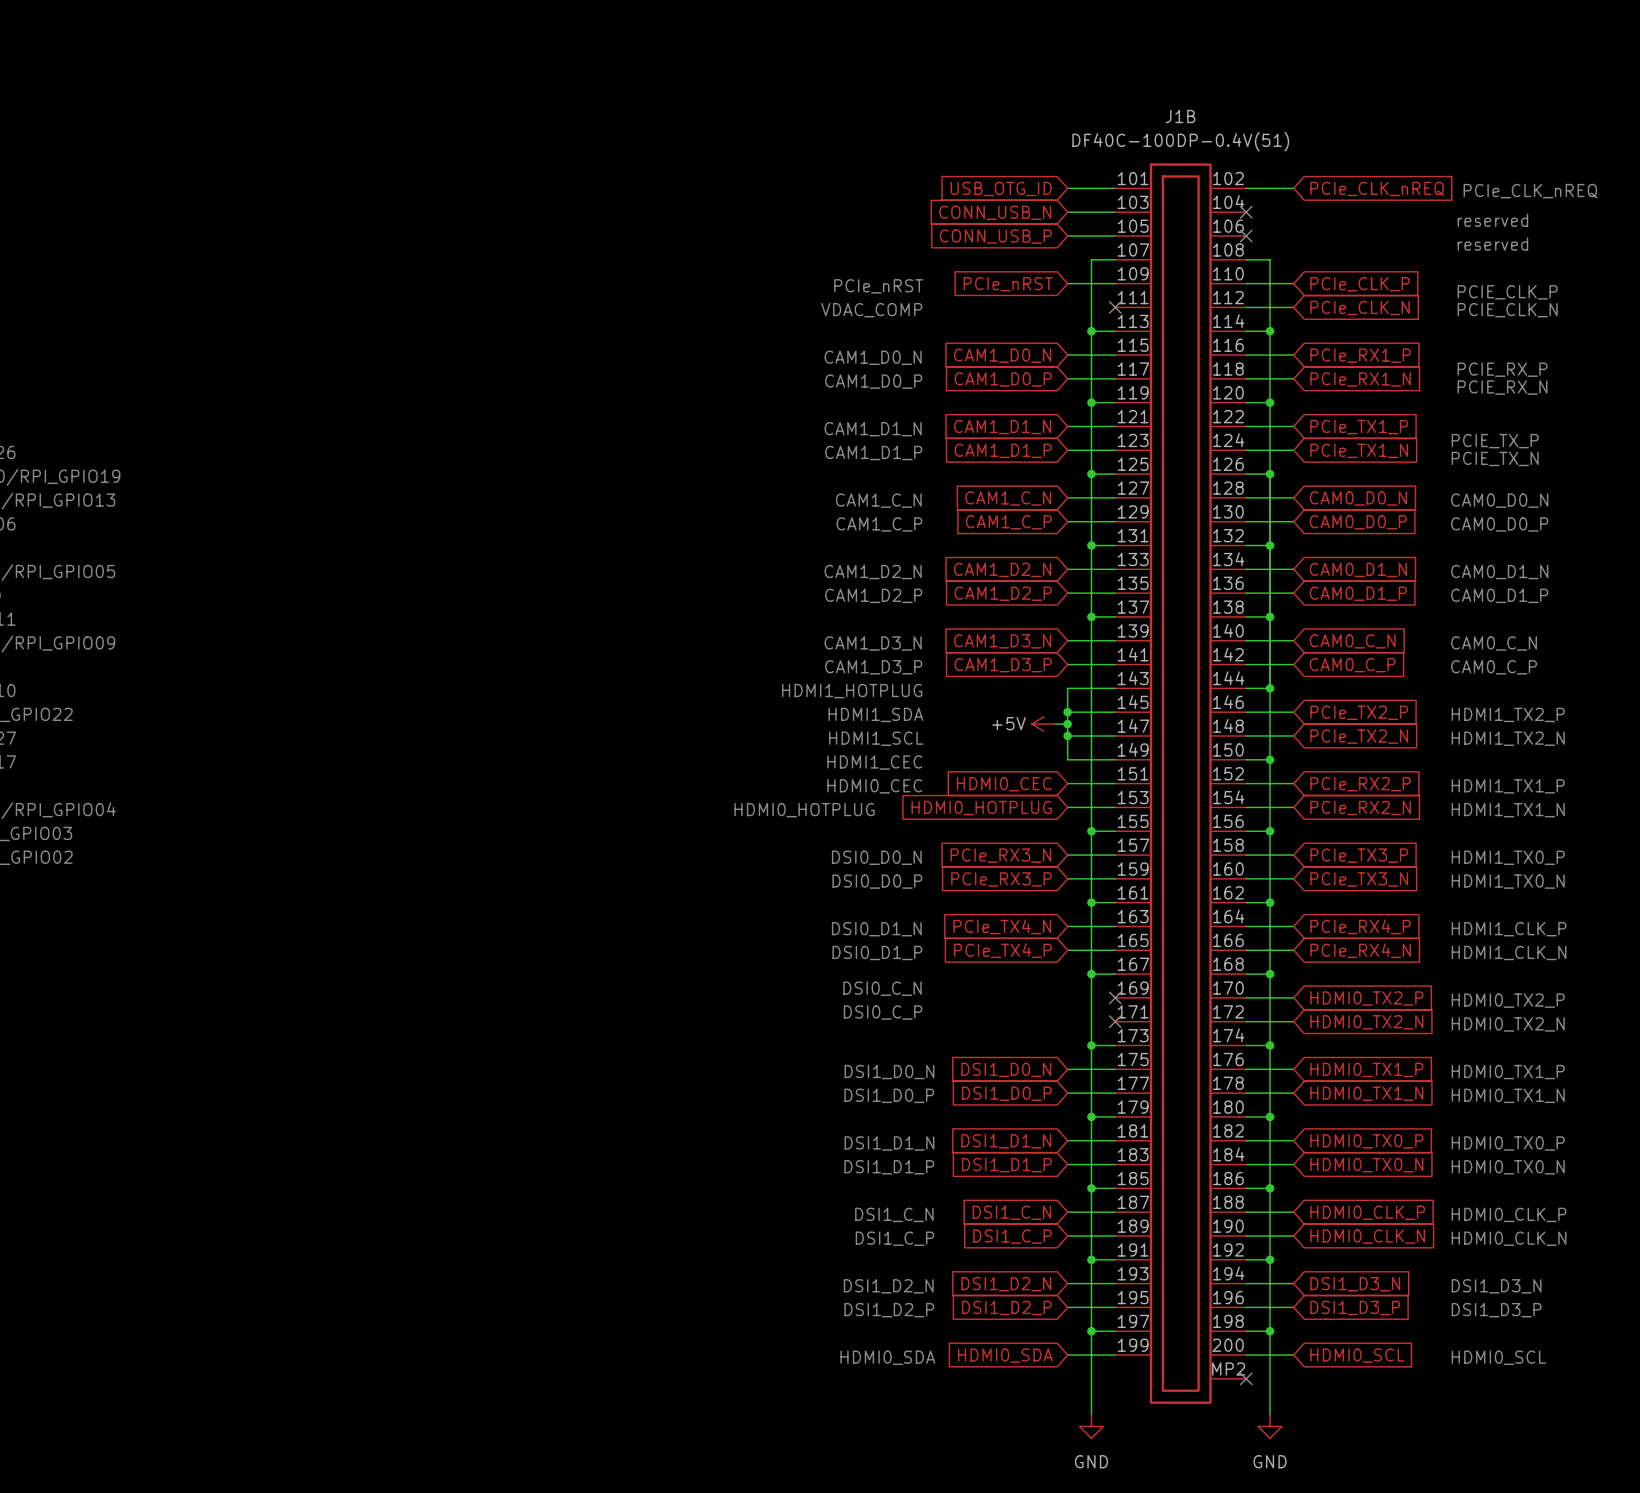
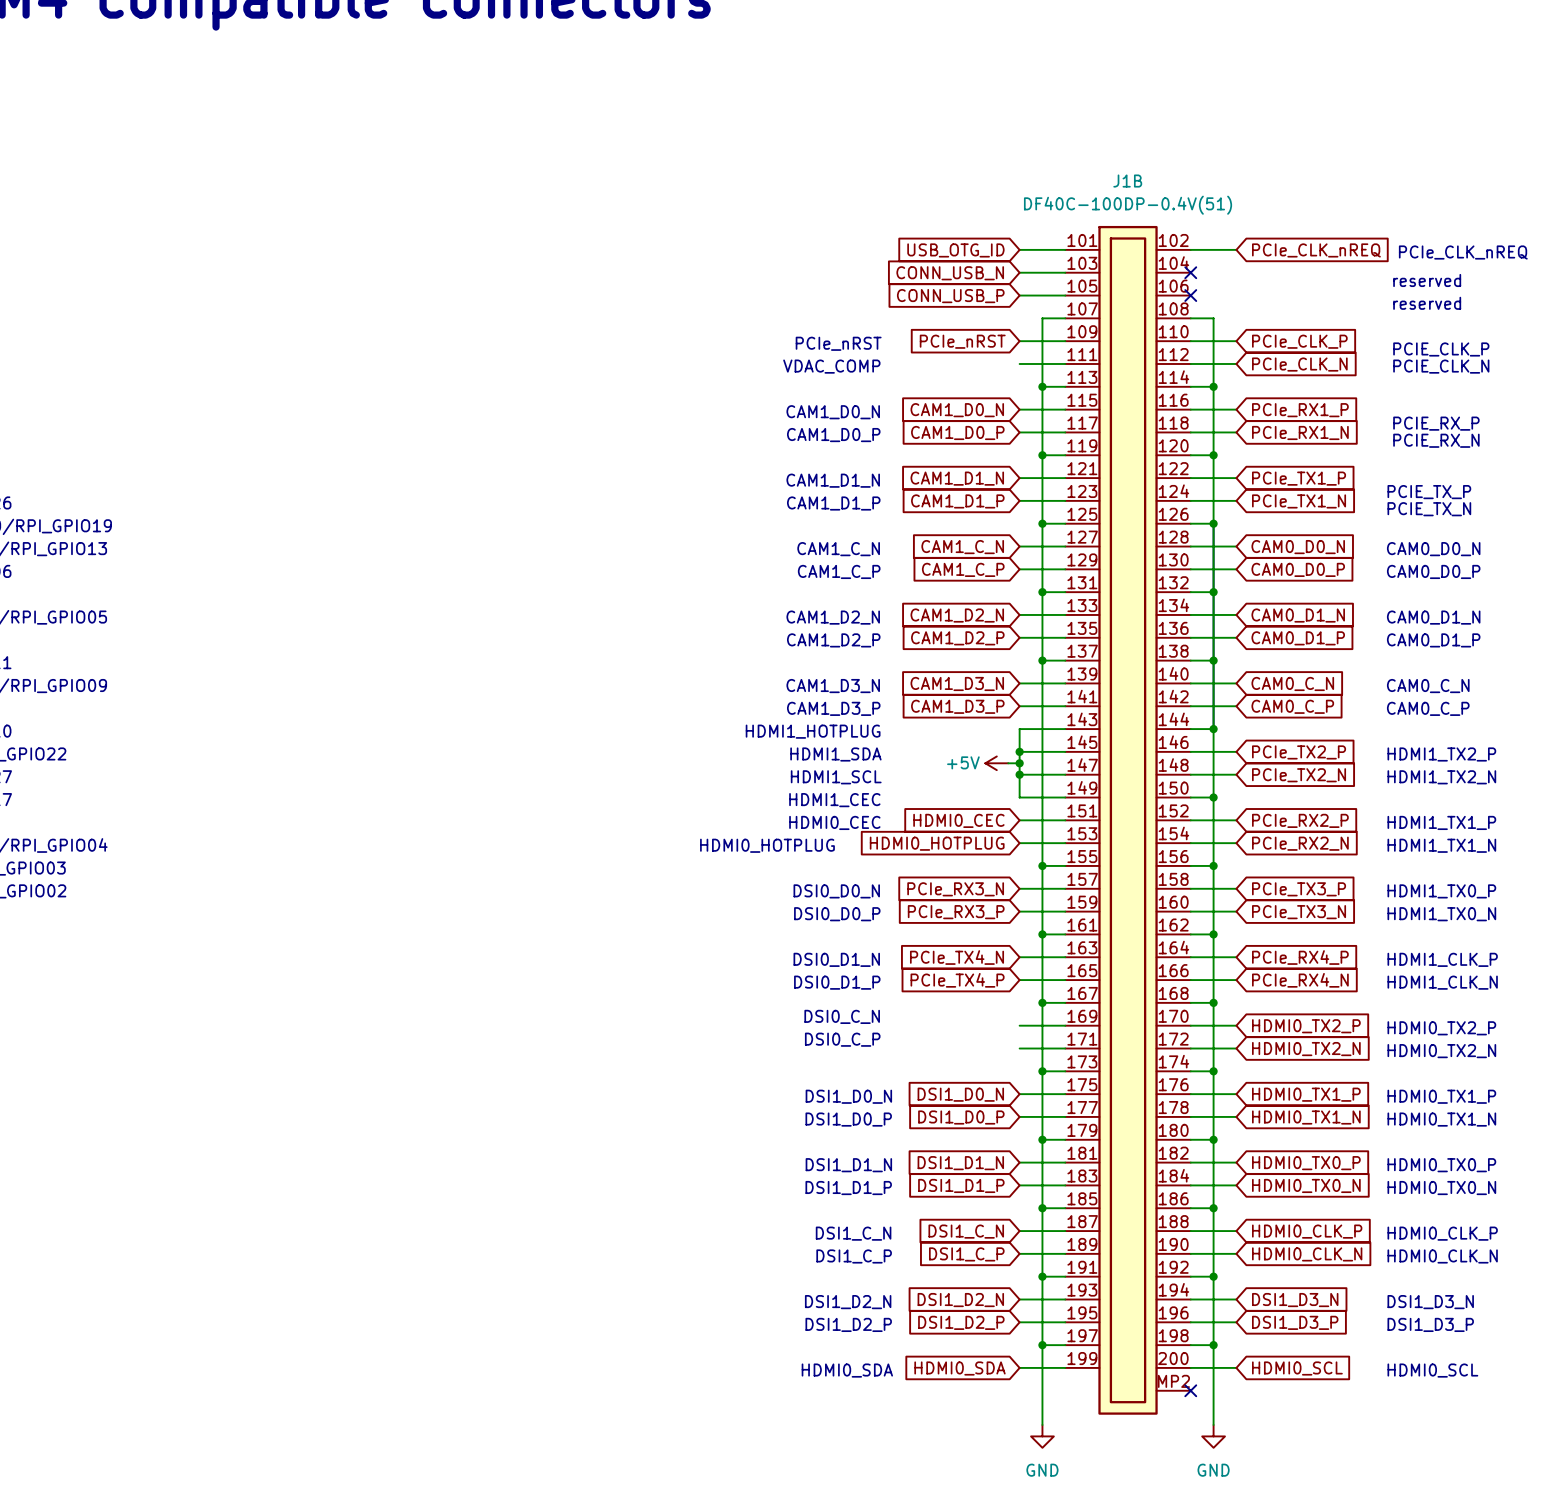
wire: none -> (1019, 363) (1065, 363)
no-connect mark: (1115, 307) -> none
wire: none -> (1019, 1025) (1065, 1025)
no-connect mark: (1115, 997) -> none
wire: none -> (1019, 1048) (1065, 1048)
no-connect mark: (1115, 1021) -> none

